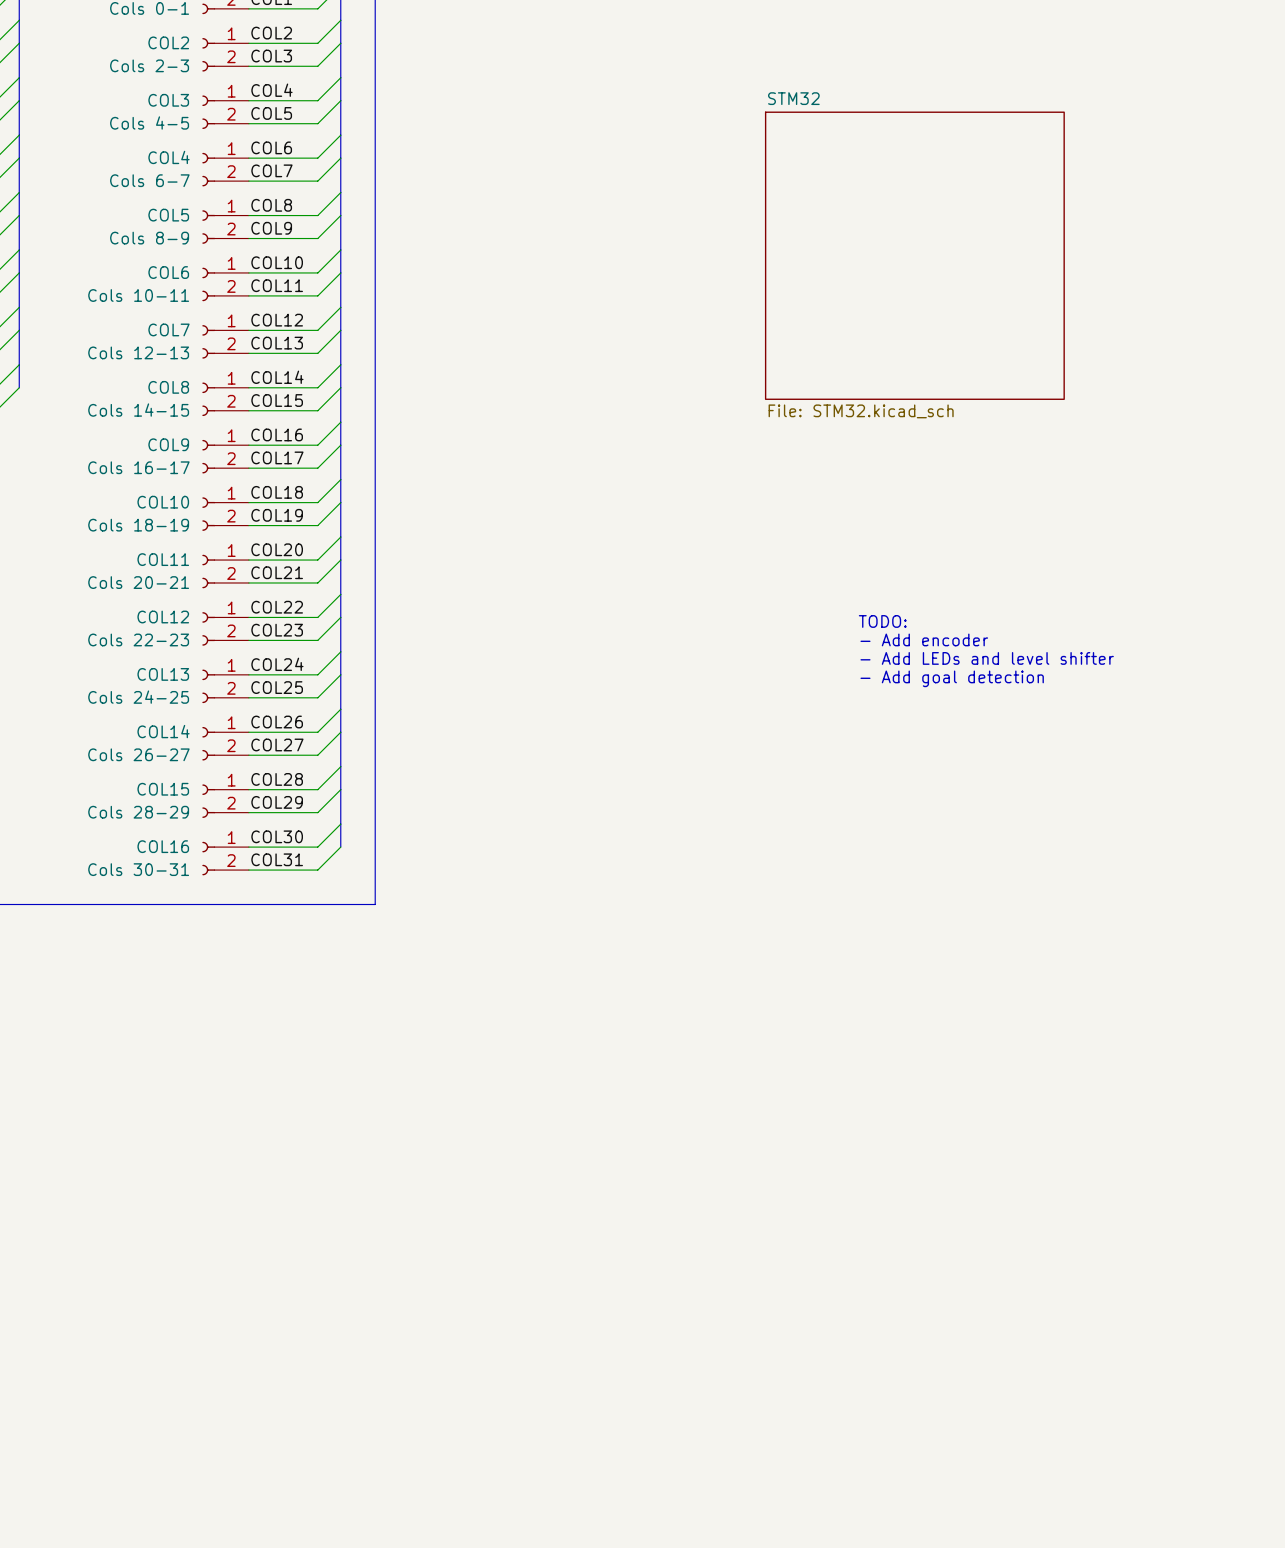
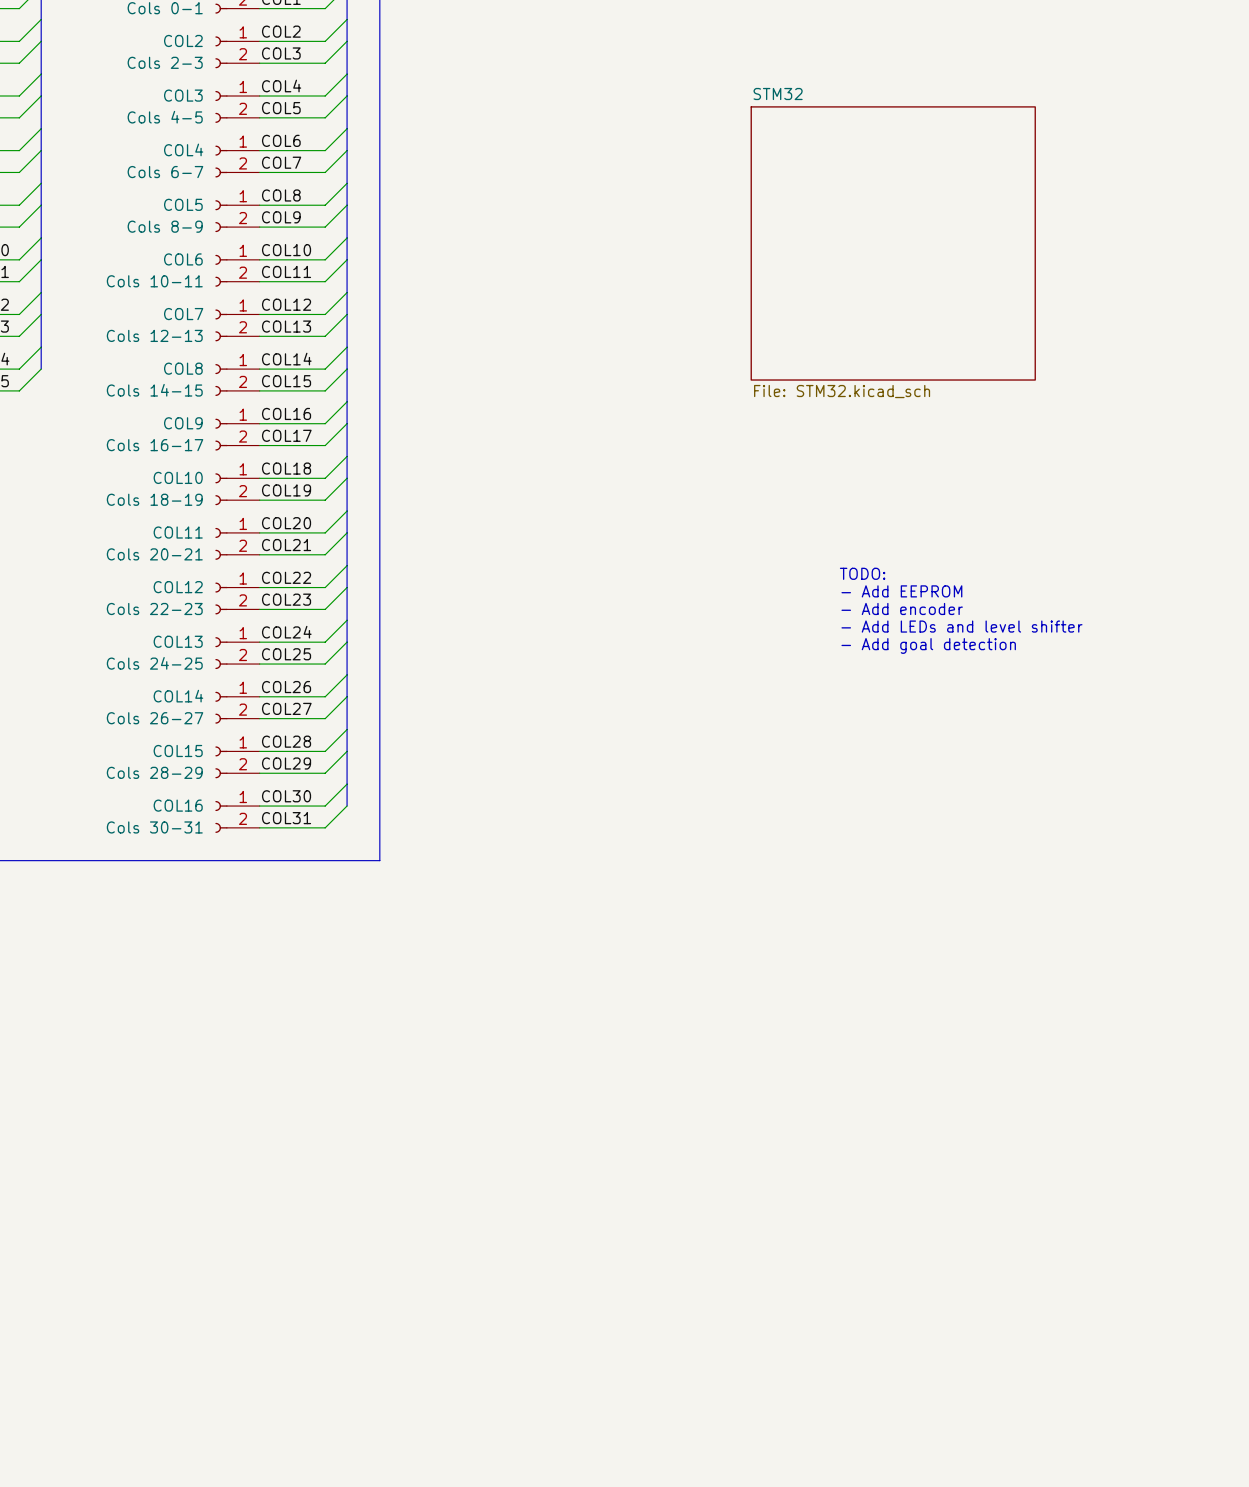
text: none -> TODO: (862, 573)
text: TODO: (882, 621) -> - Add EEPROM (901, 591)

